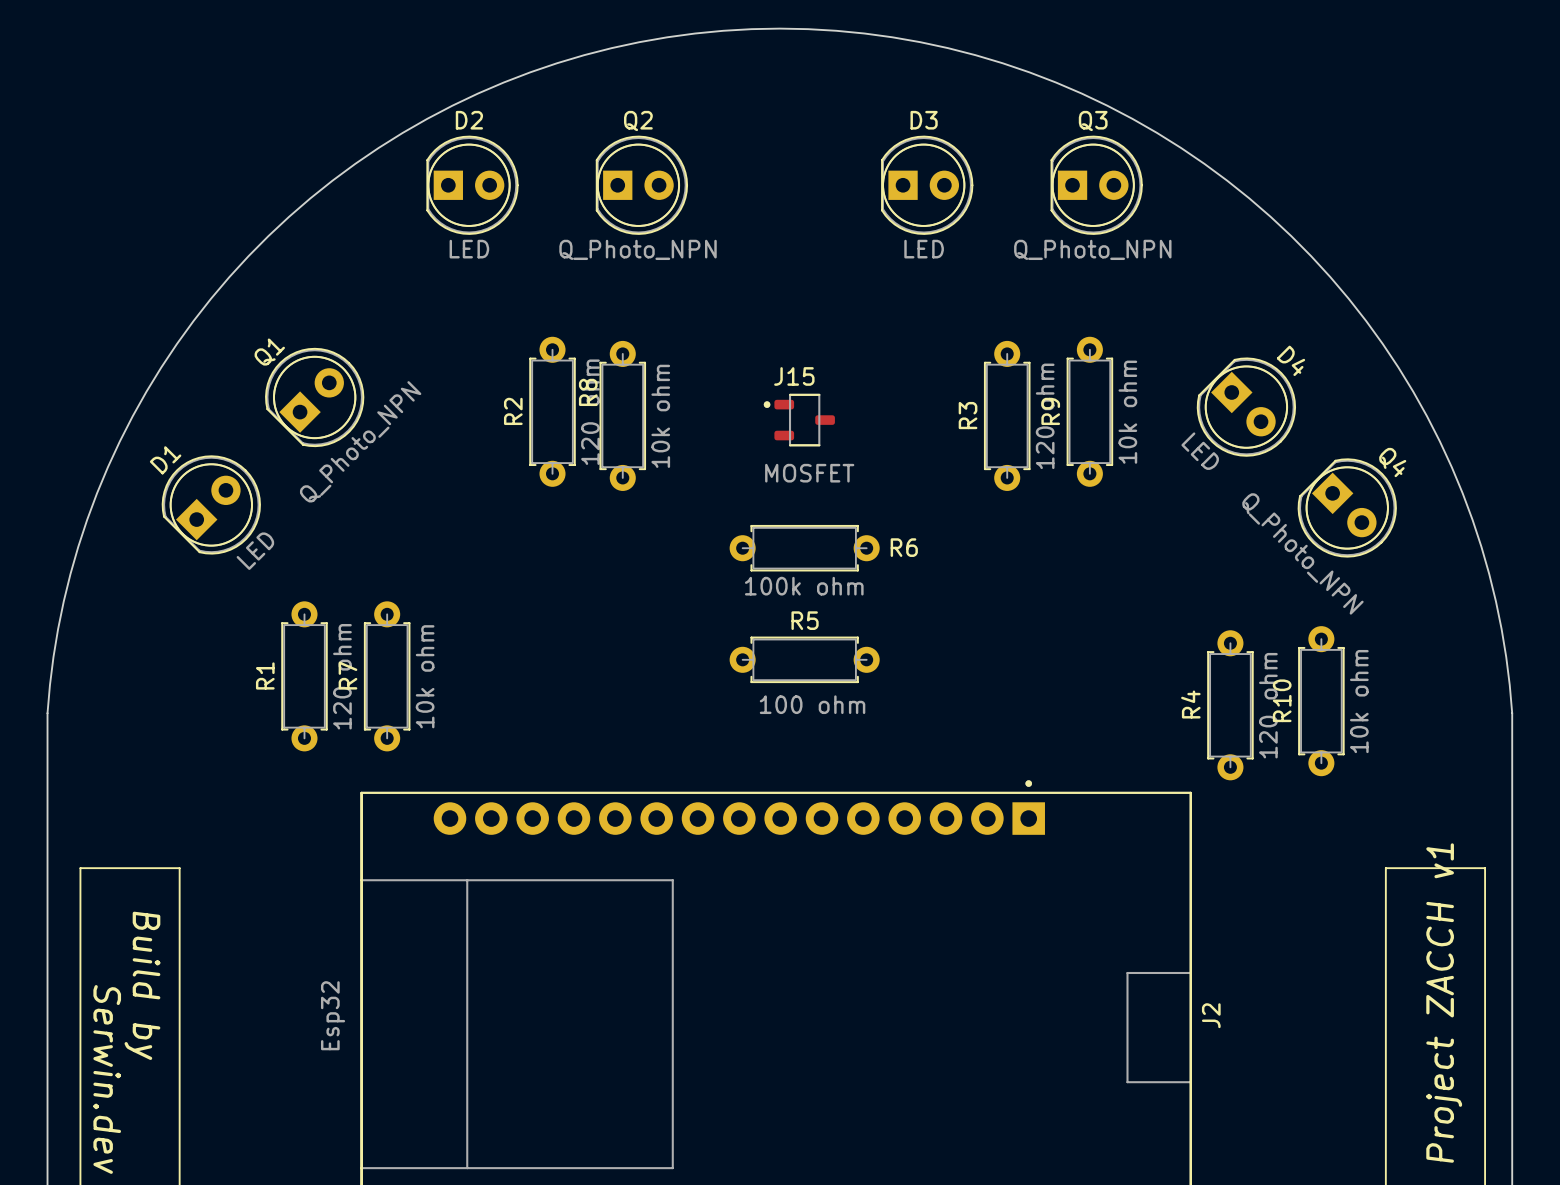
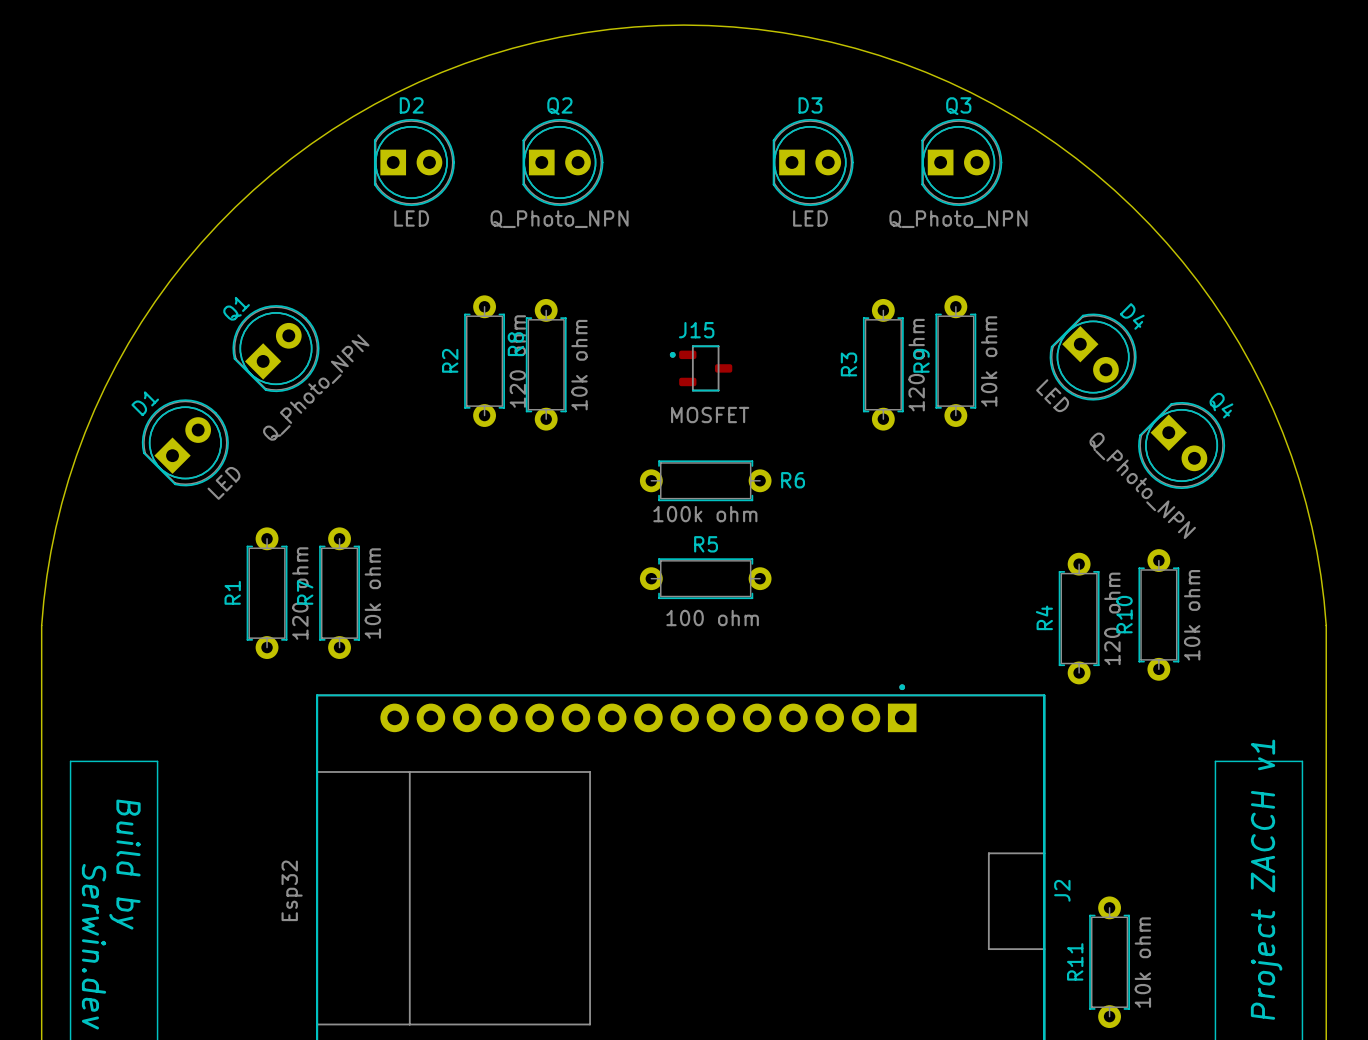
R11: none -> 10k ohm (1109, 962)

